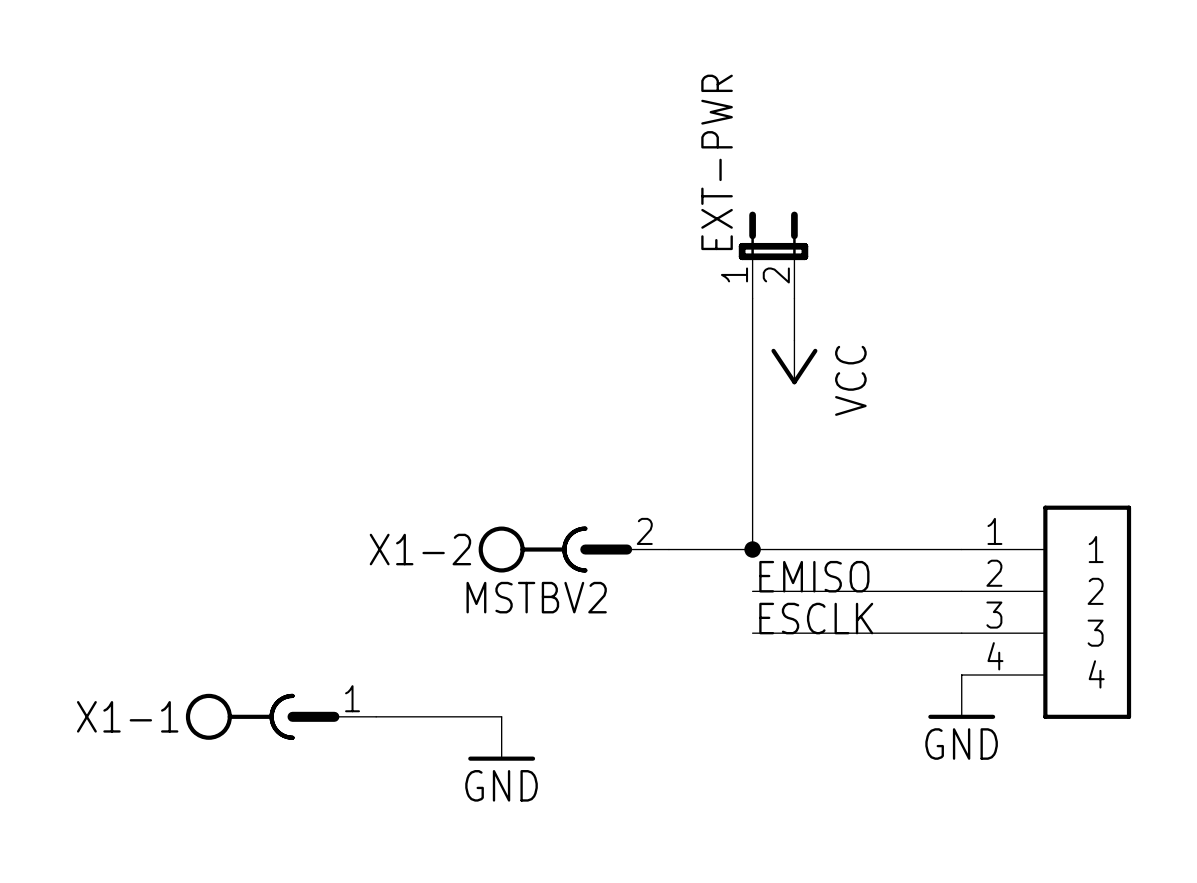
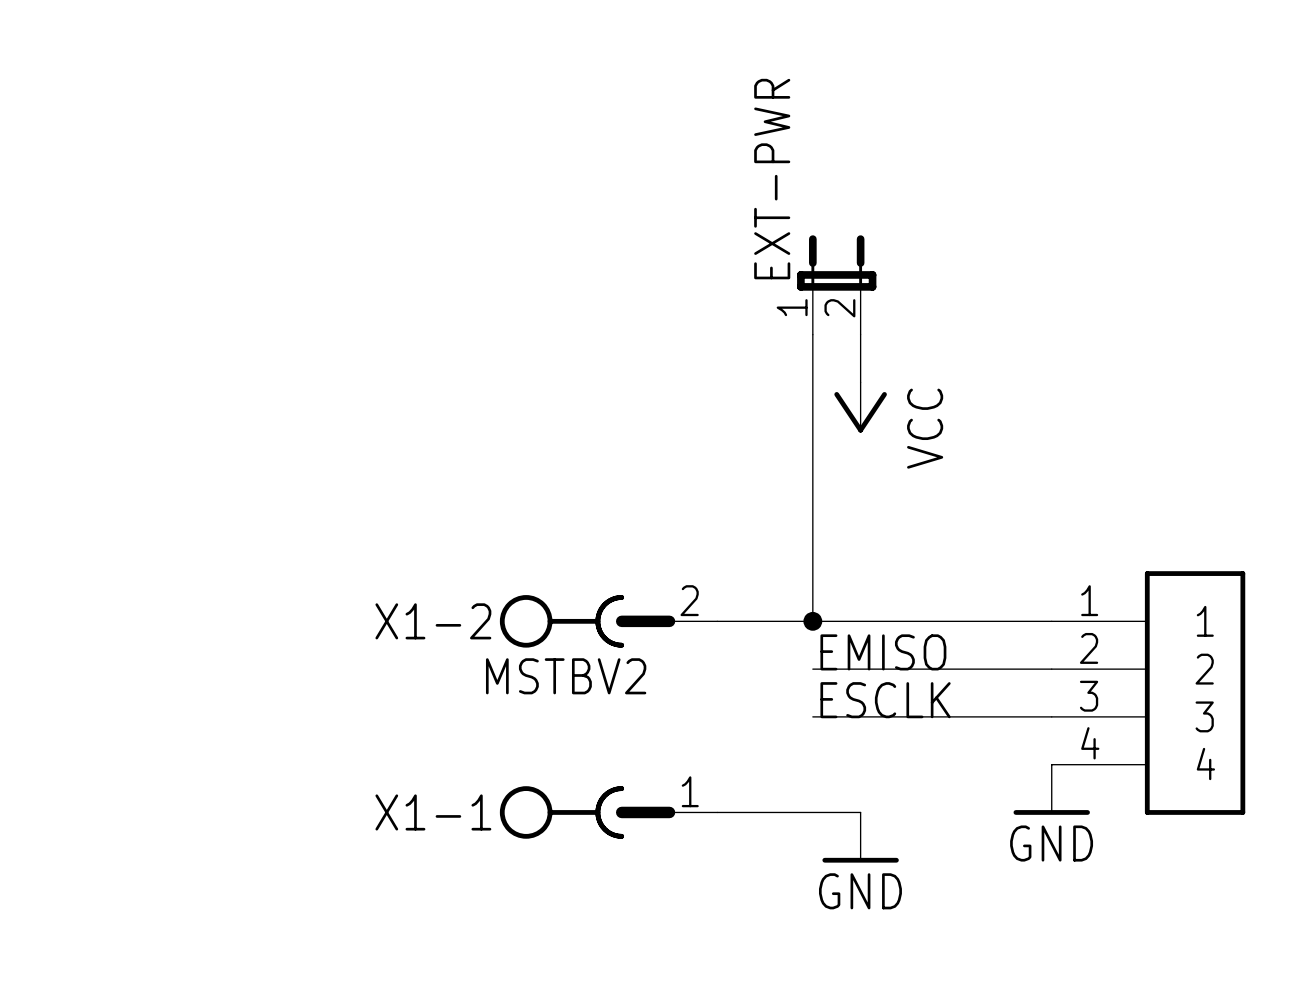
X1-1 position: (281, 716) -> (608, 812)
wire: (376, 716) (501, 716) -> (717, 812) (860, 812)
power symbol position: GND (501, 738) -> GND (860, 837)

